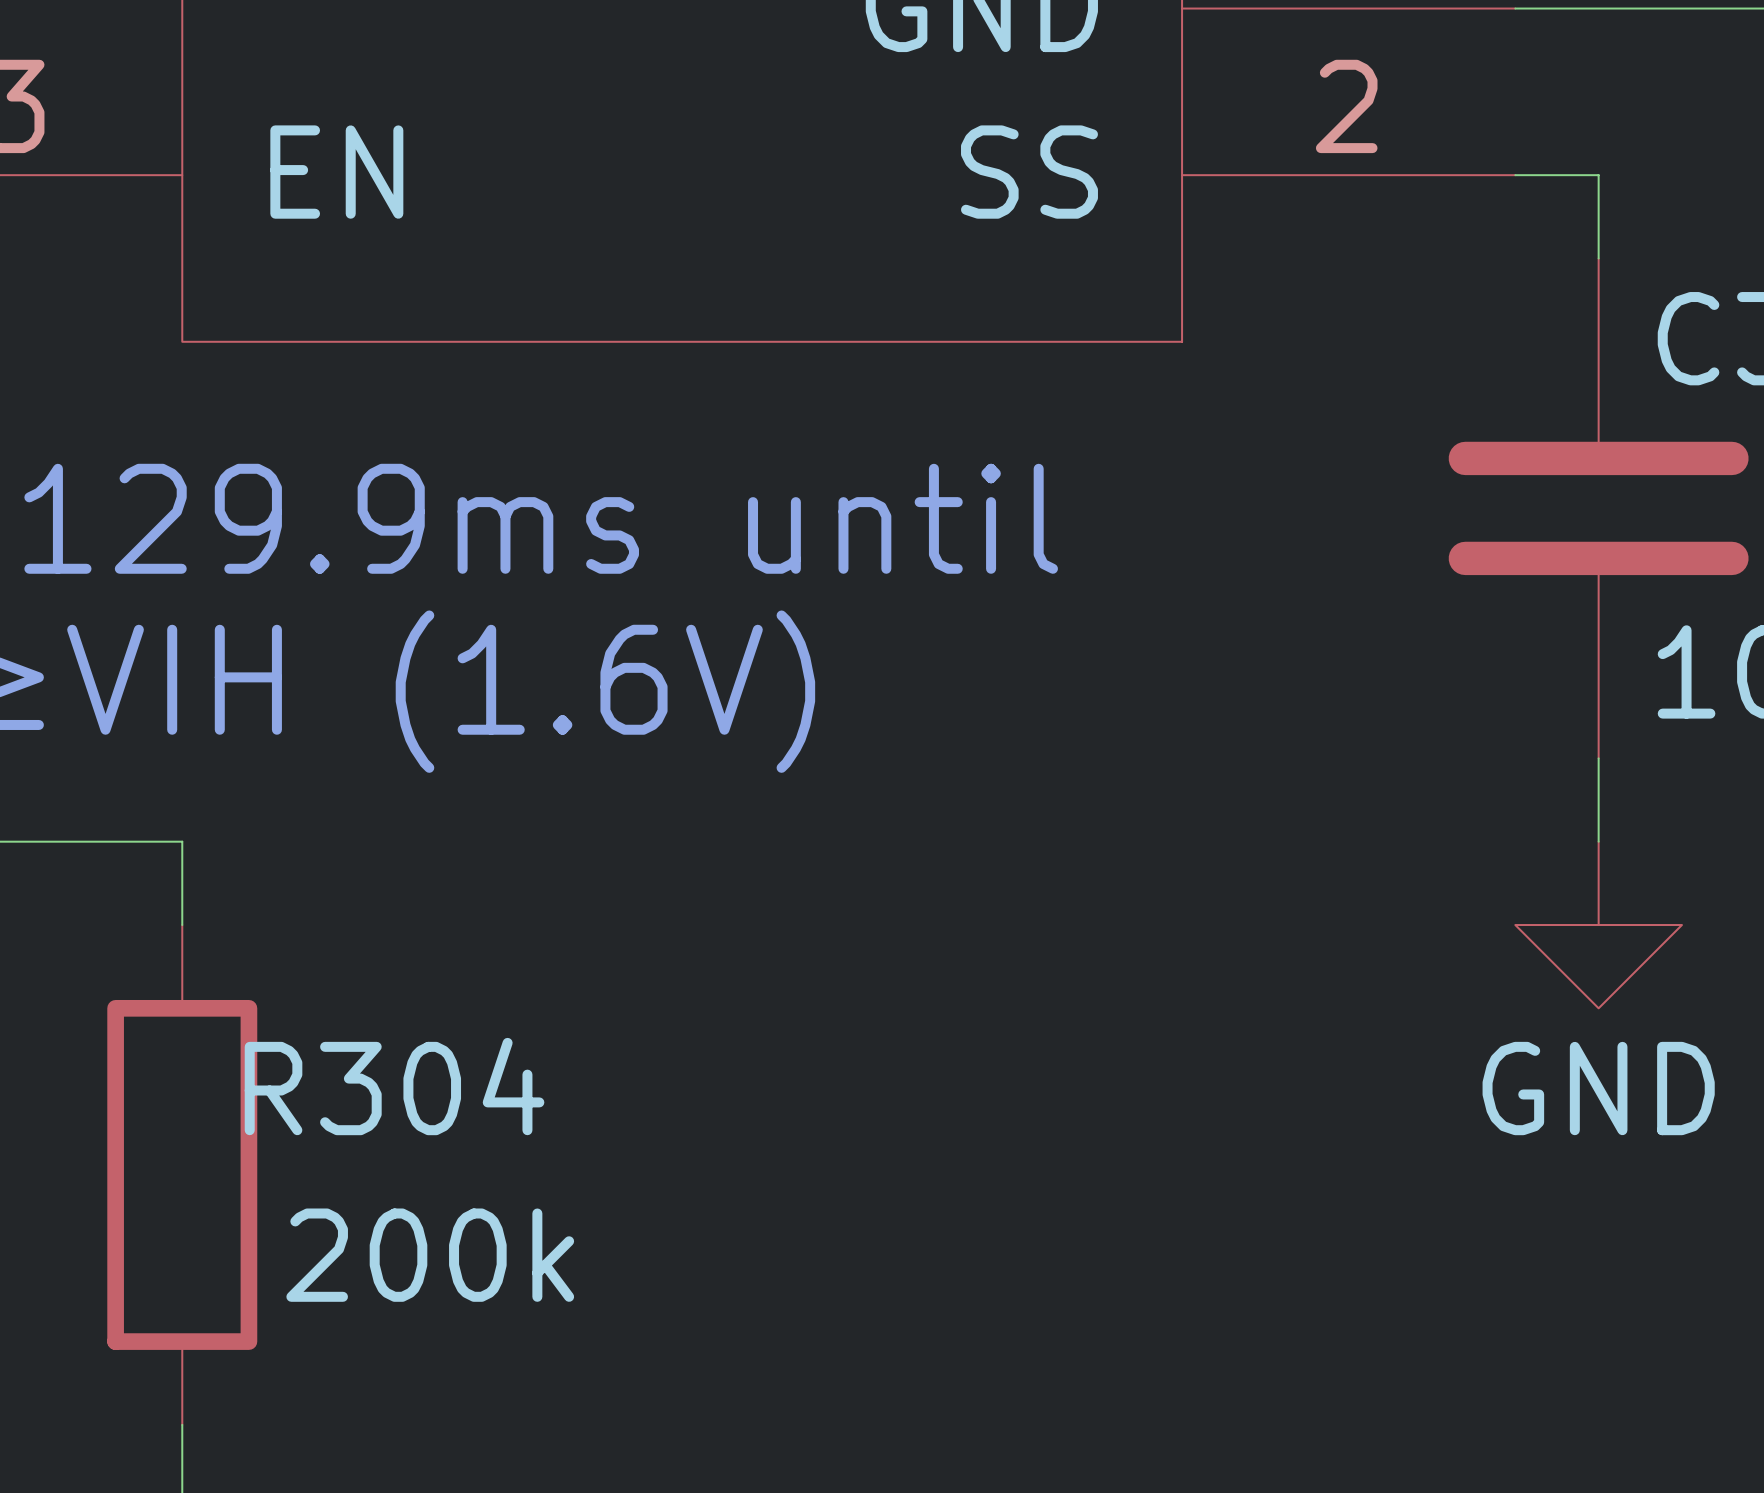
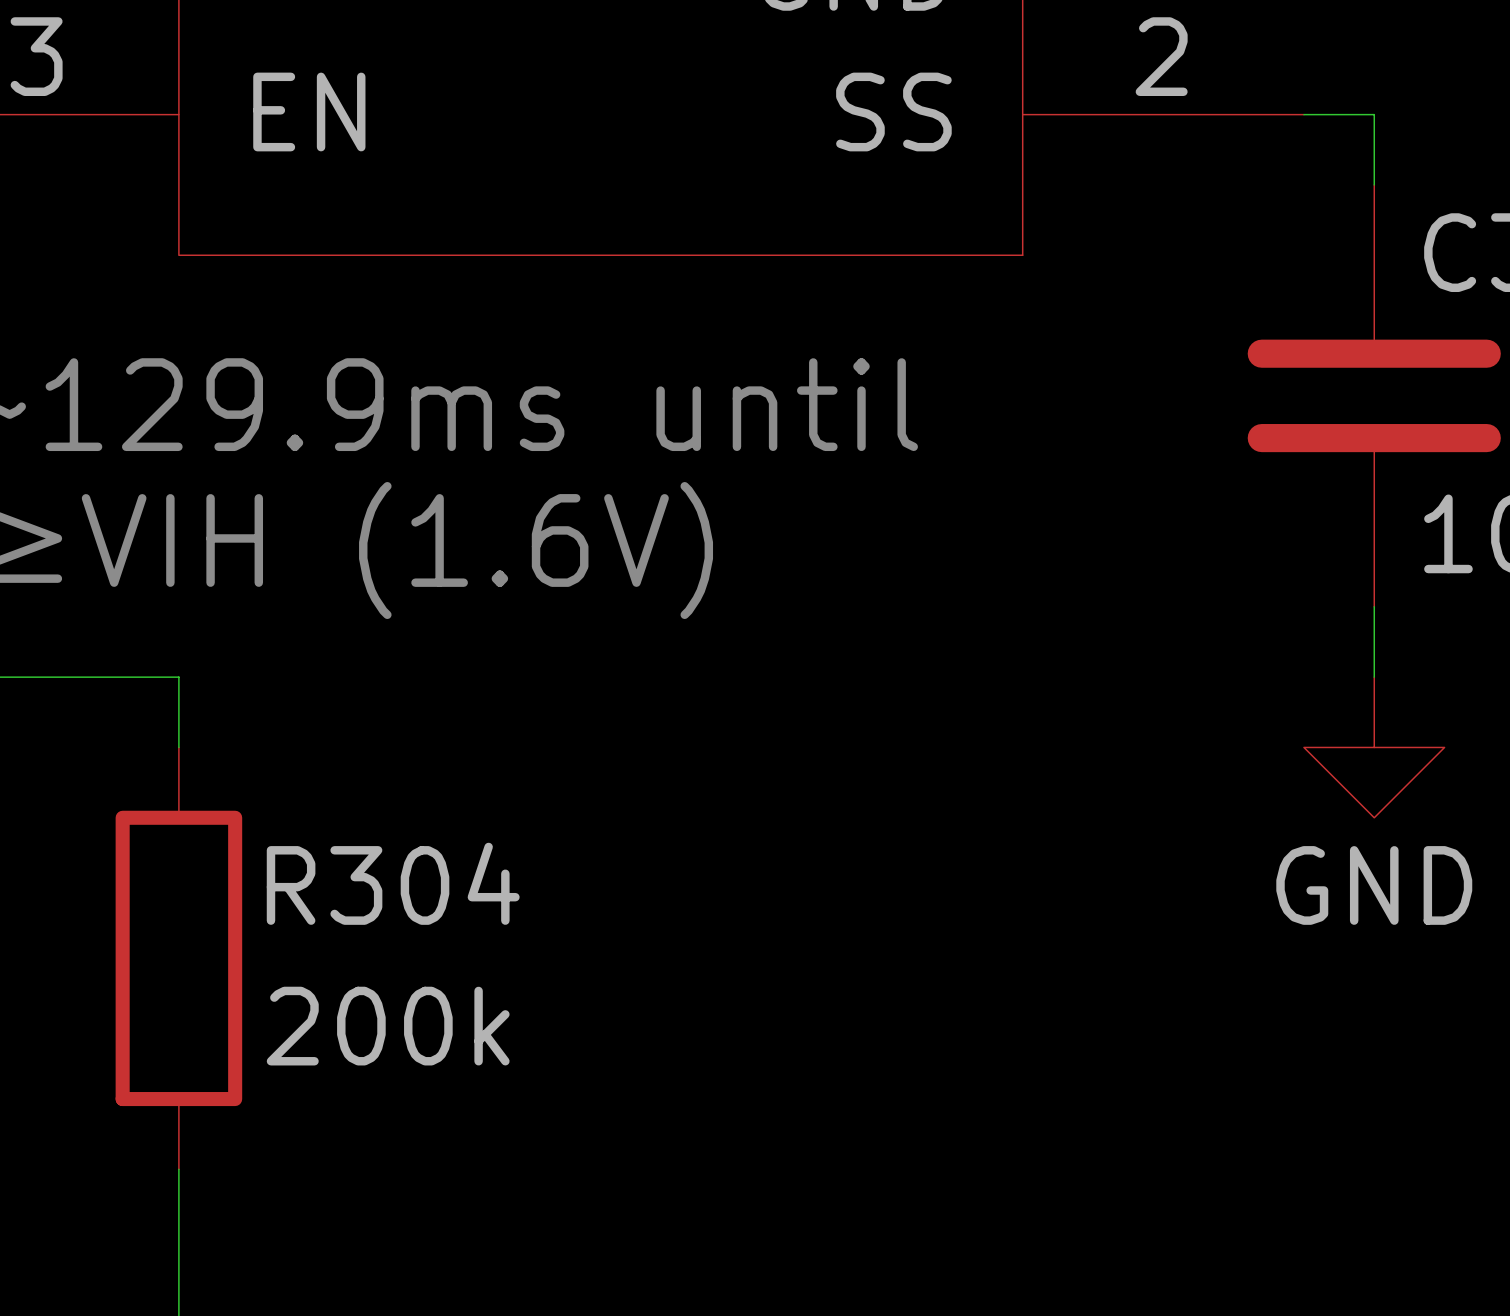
R304 name position: R304 (394, 1086) -> R304 (393, 883)

